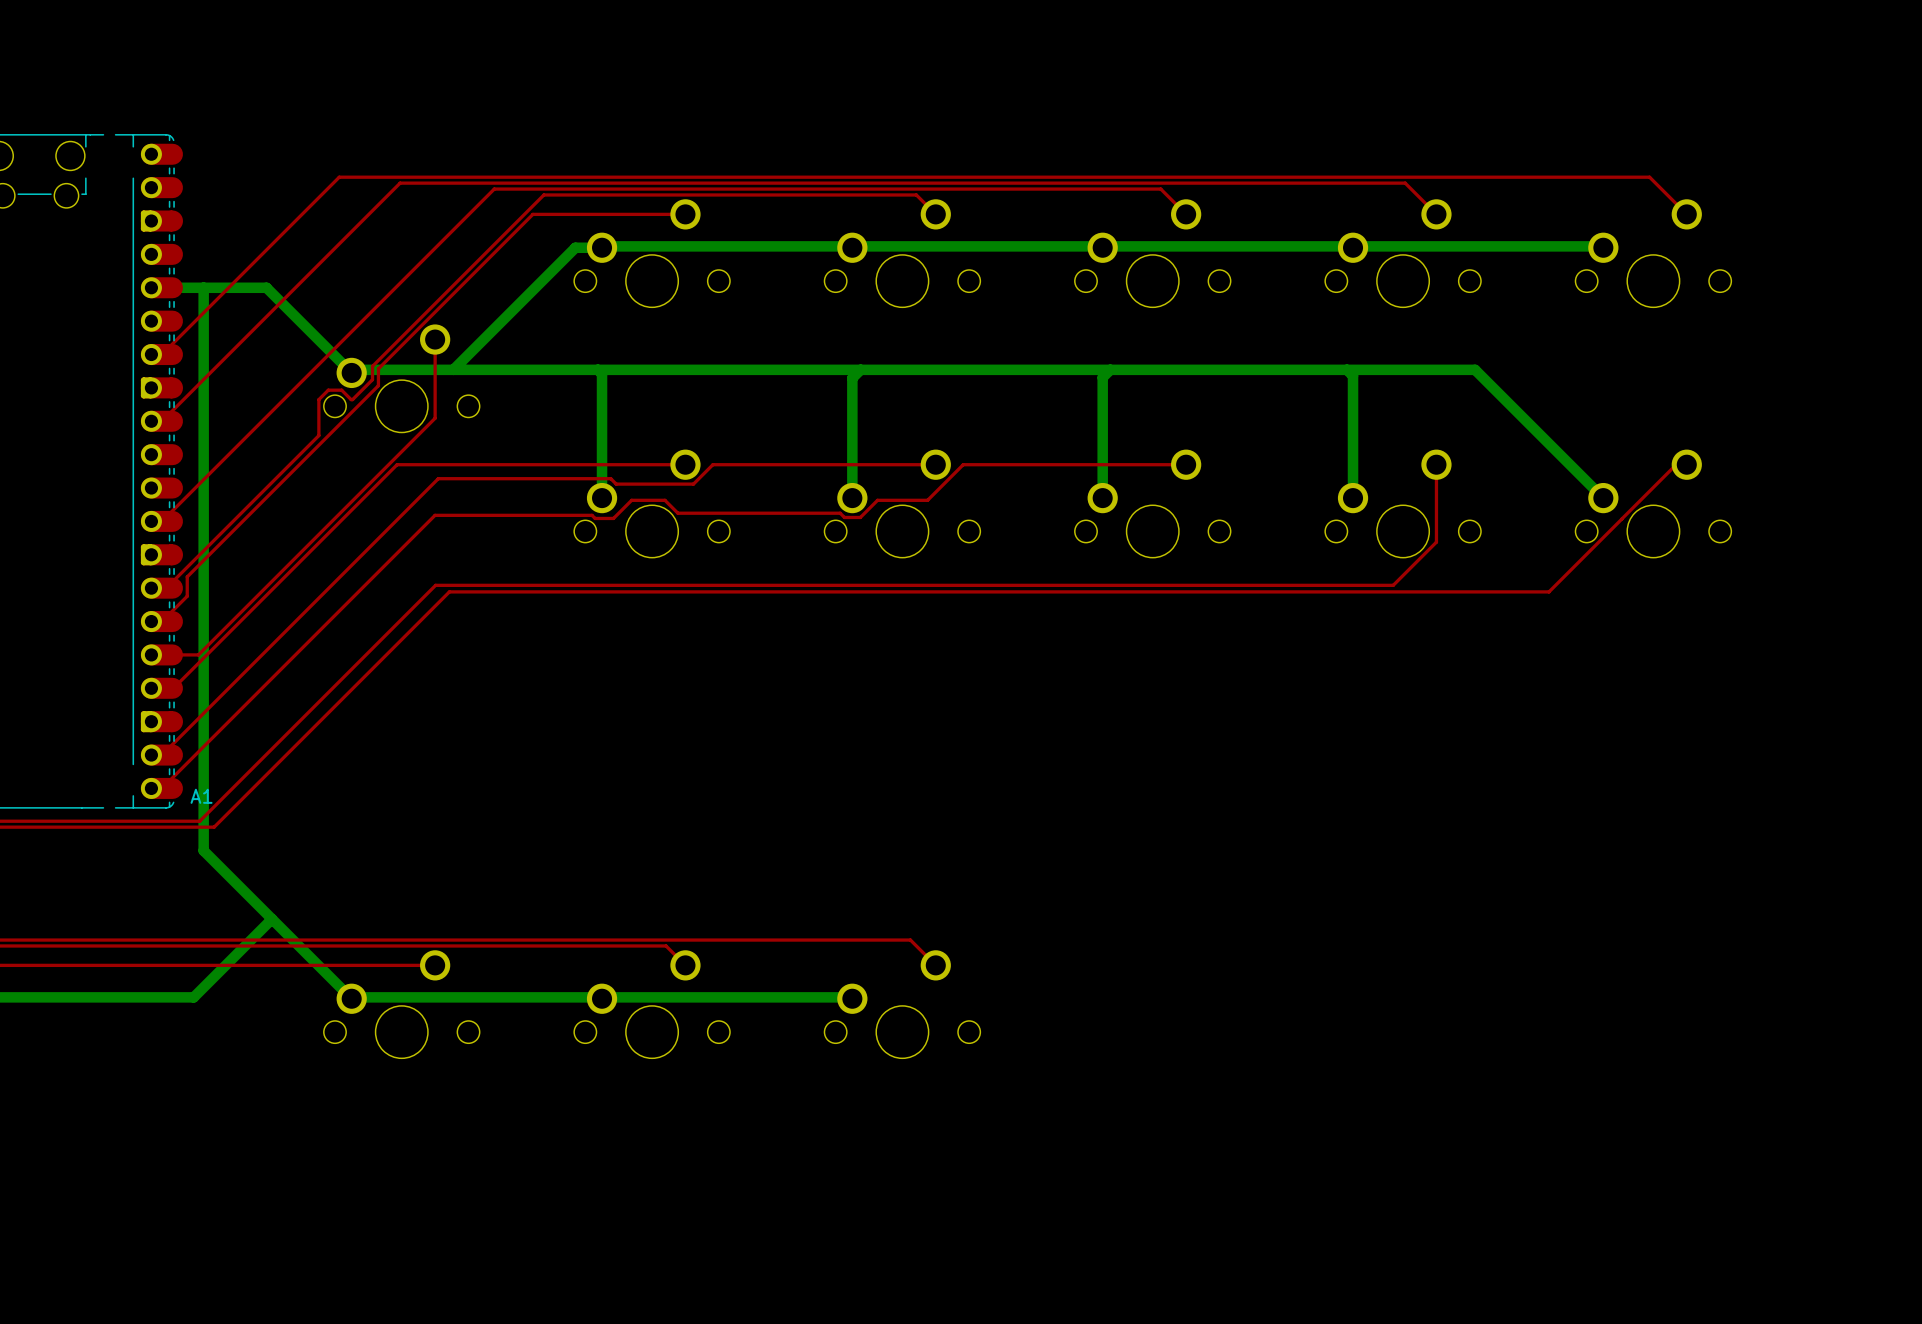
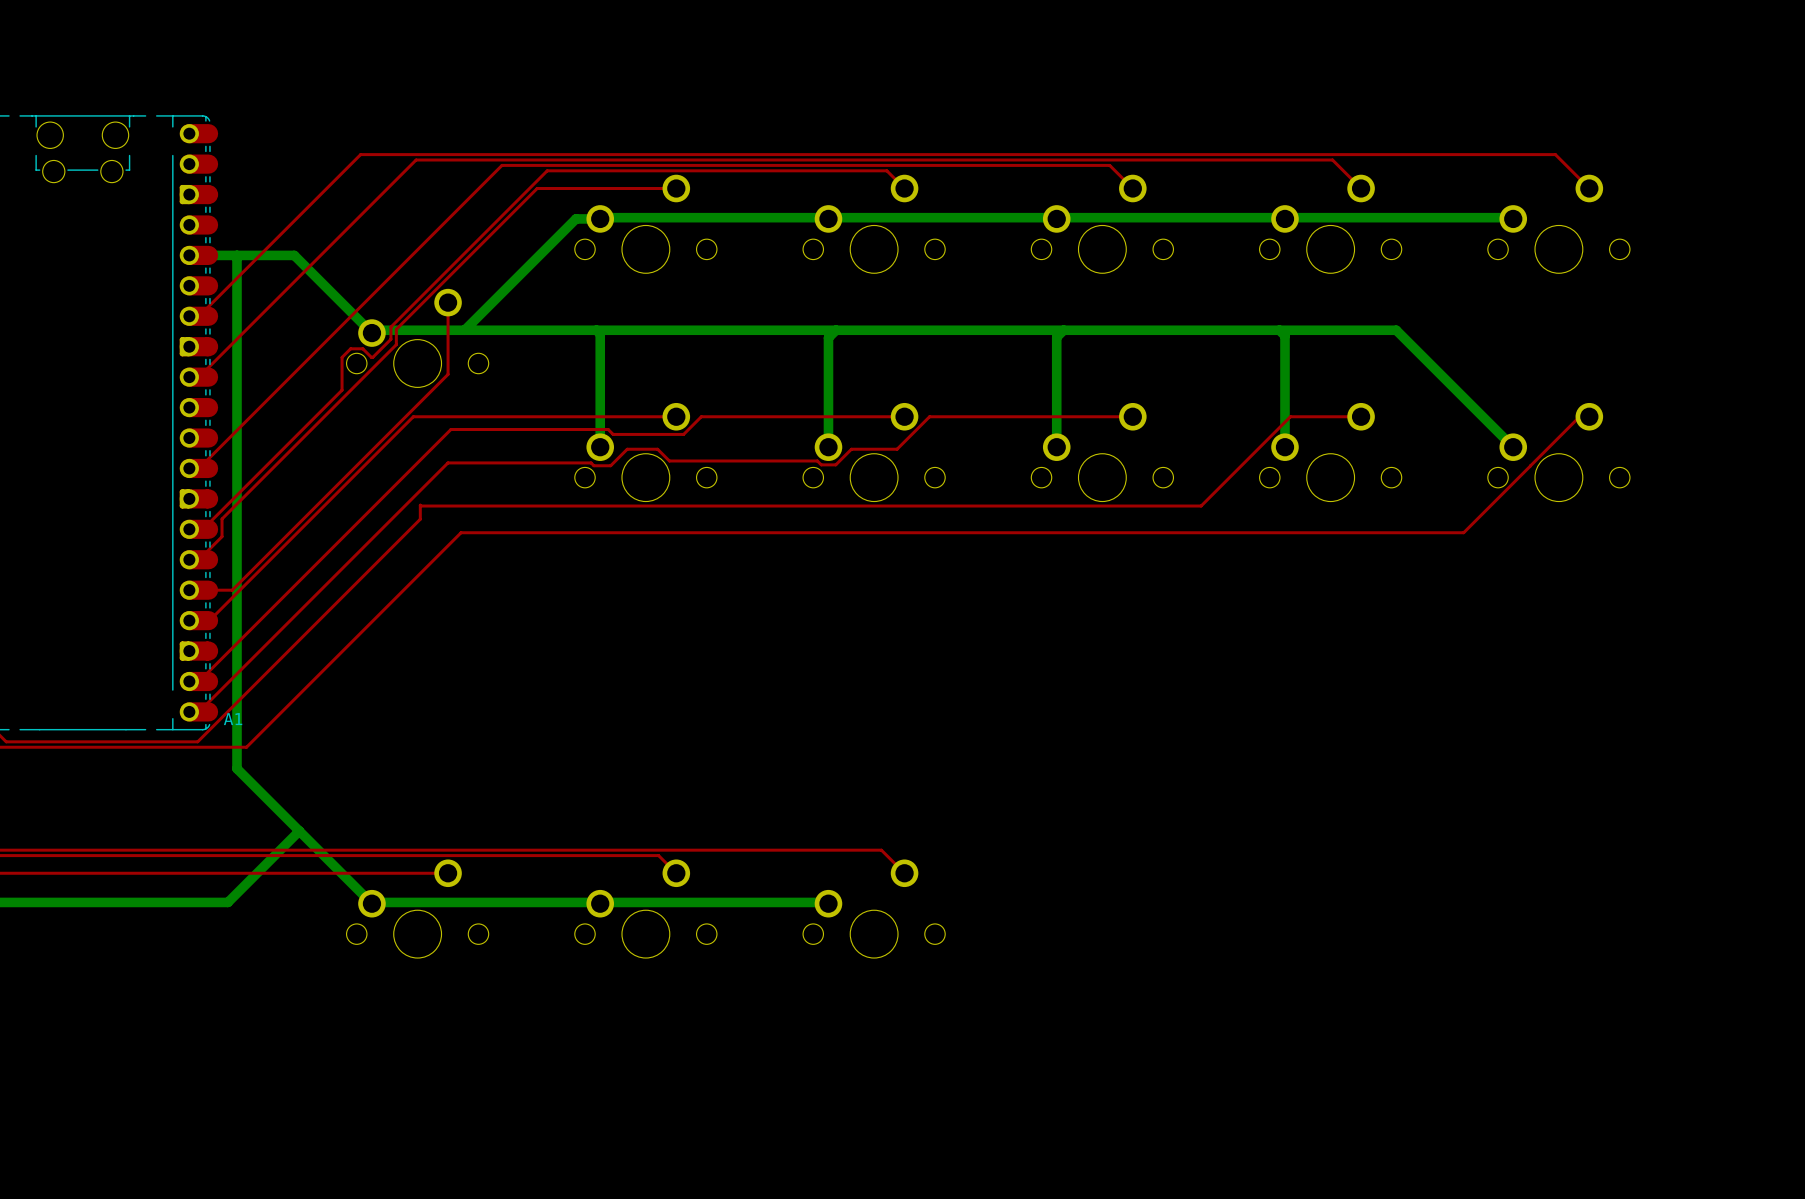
top track: (1436, 464) (1436, 542) (1393, 585) (435, 585) (199, 821) (160, 821) -> (1361, 416) (1290, 416) (1201, 506) (420, 505) (420, 519) (197, 741)

